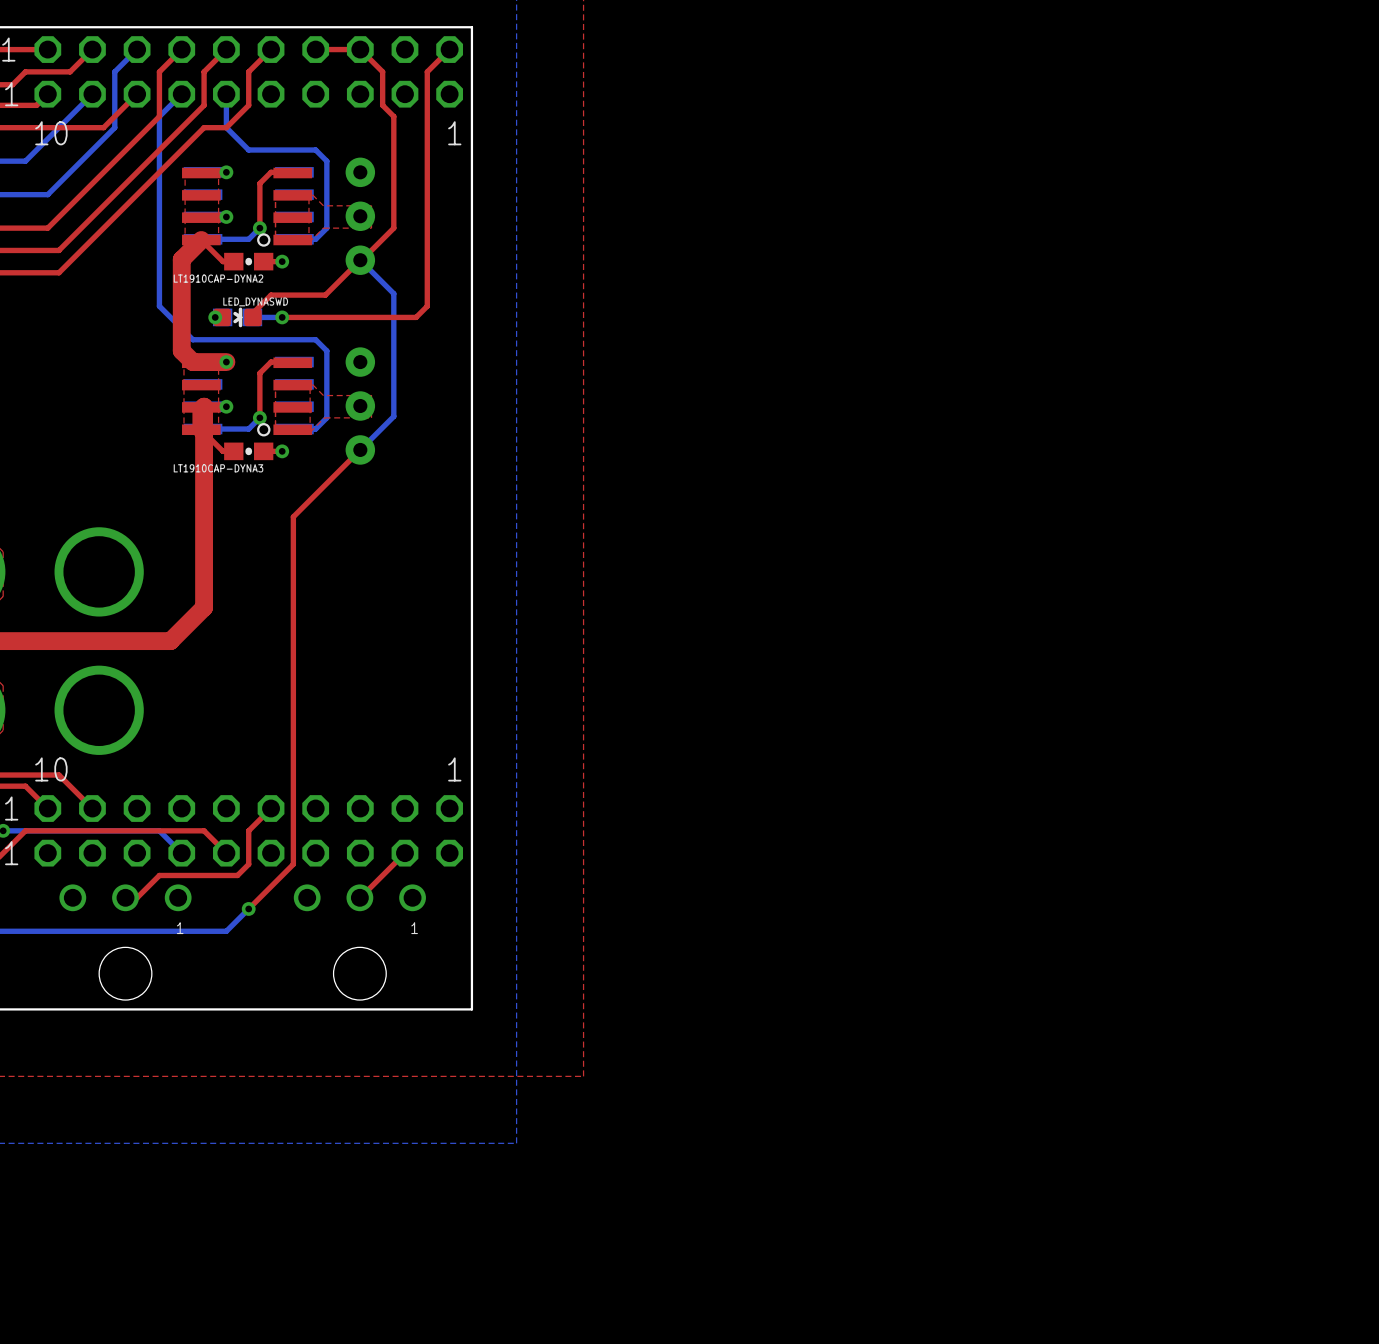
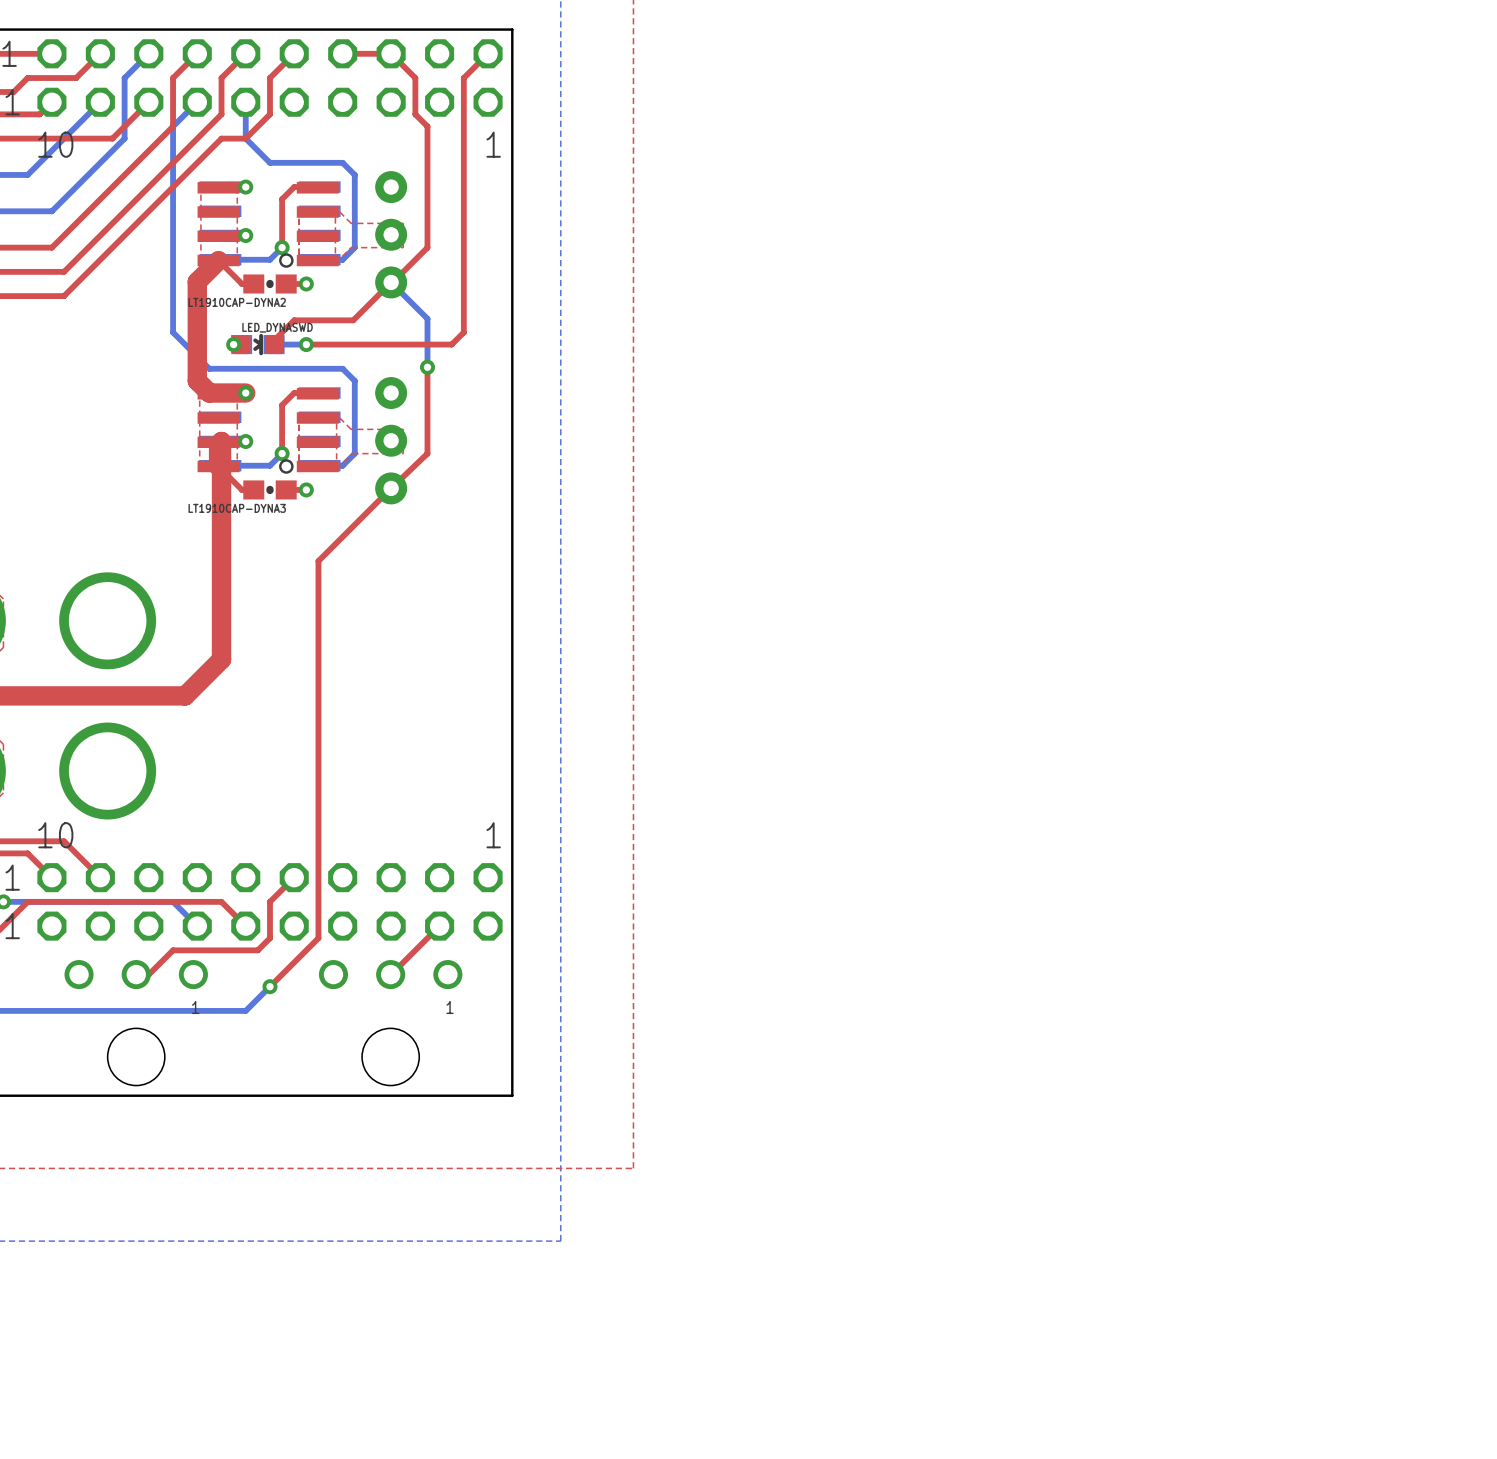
top track: none -> (427, 367) (427, 453) (391, 488)
bottom track: (393, 338) (393, 416) (360, 449) -> none
via: none -> (427, 367)

